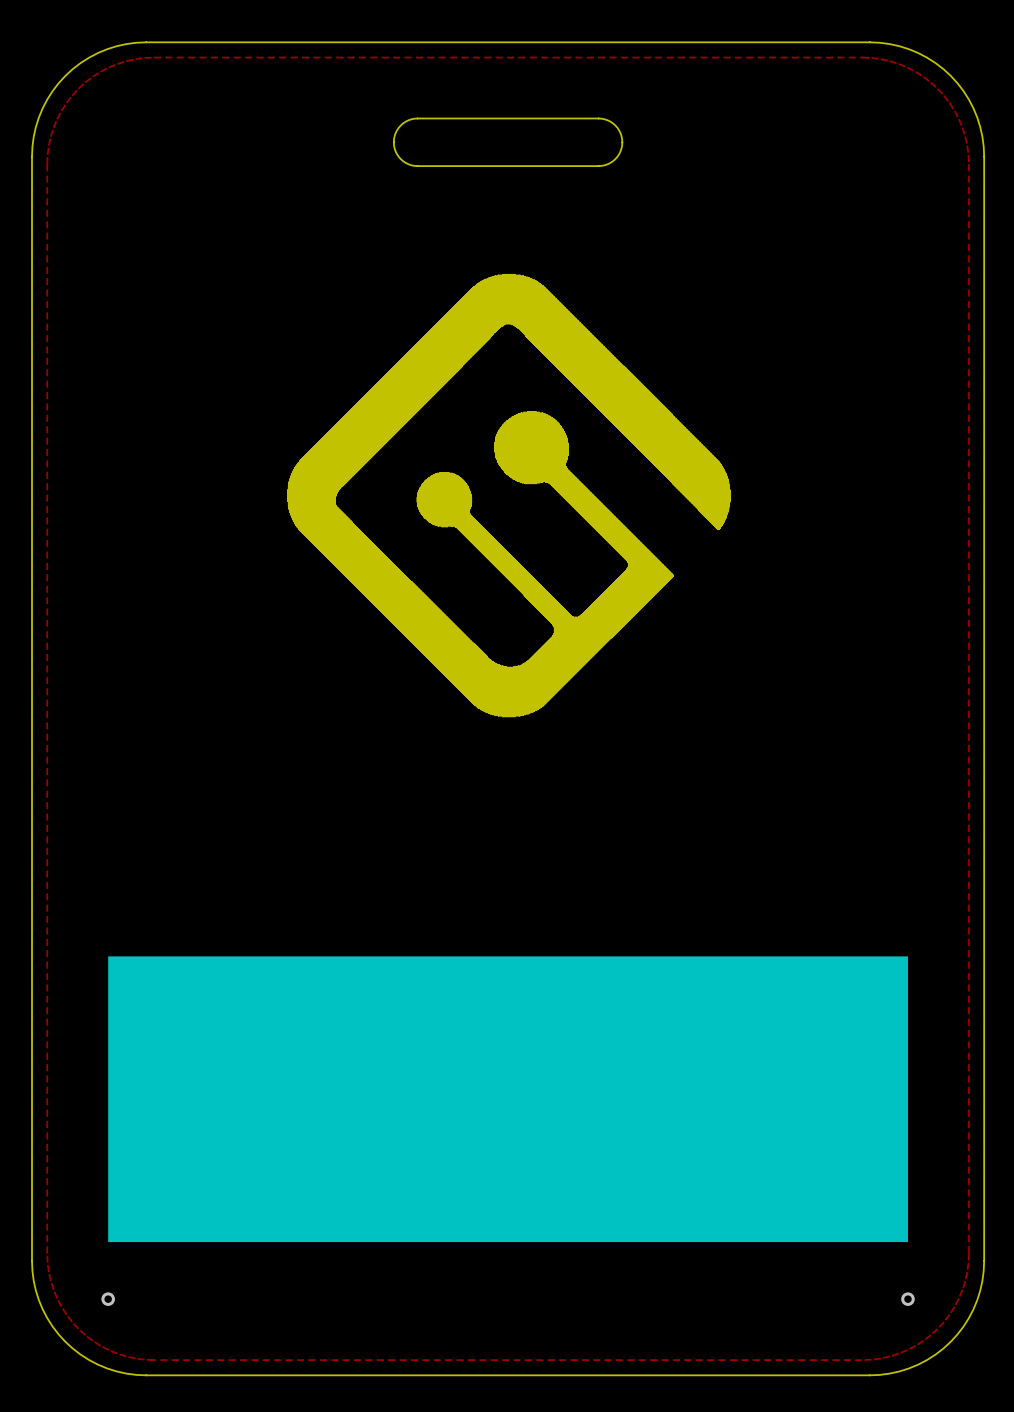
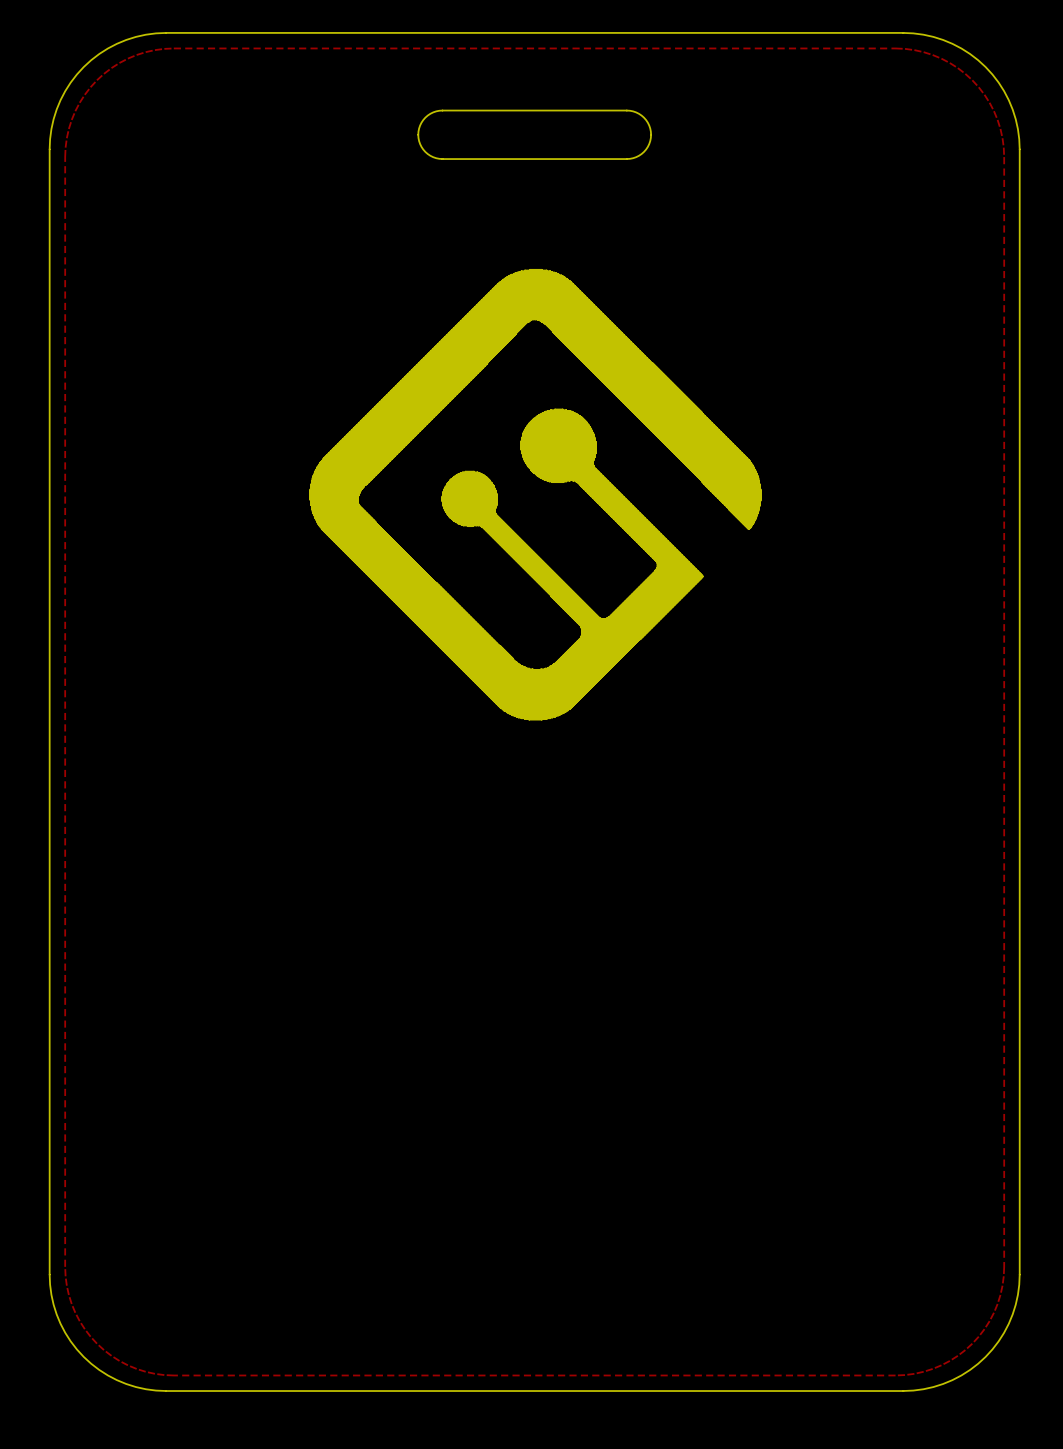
drawing: [108, 956, 908, 1243] -> none
via: (108, 1299) -> none
via: (907, 1299) -> none

